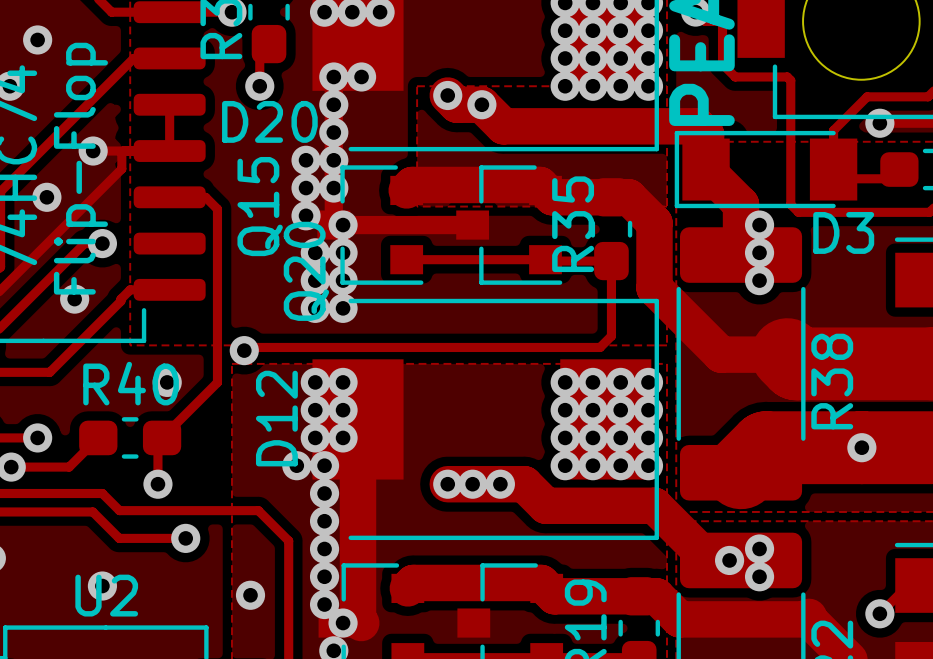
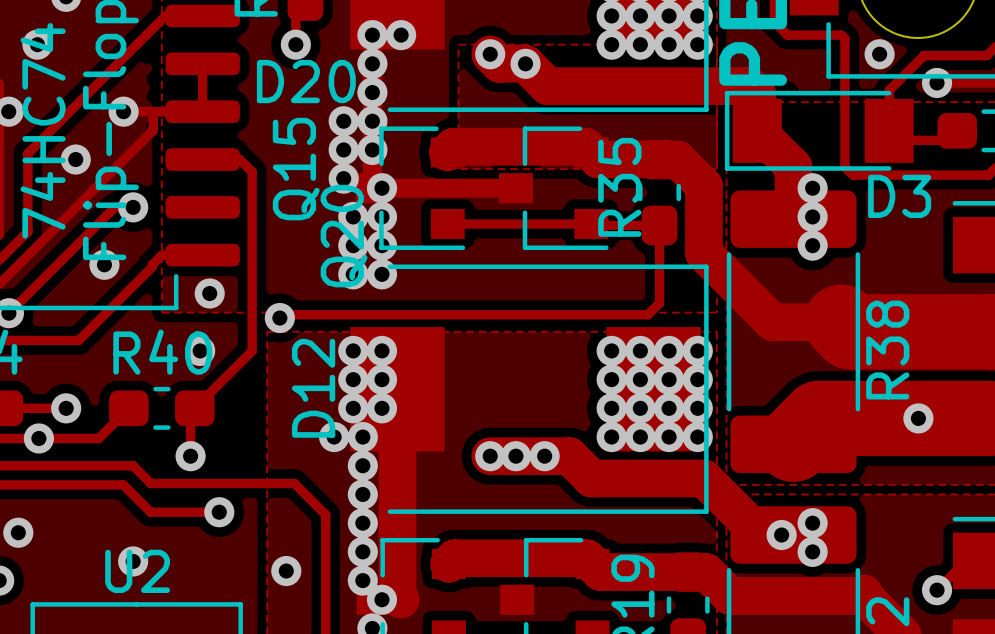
via: none -> (879, 54)
via: none -> (209, 293)

